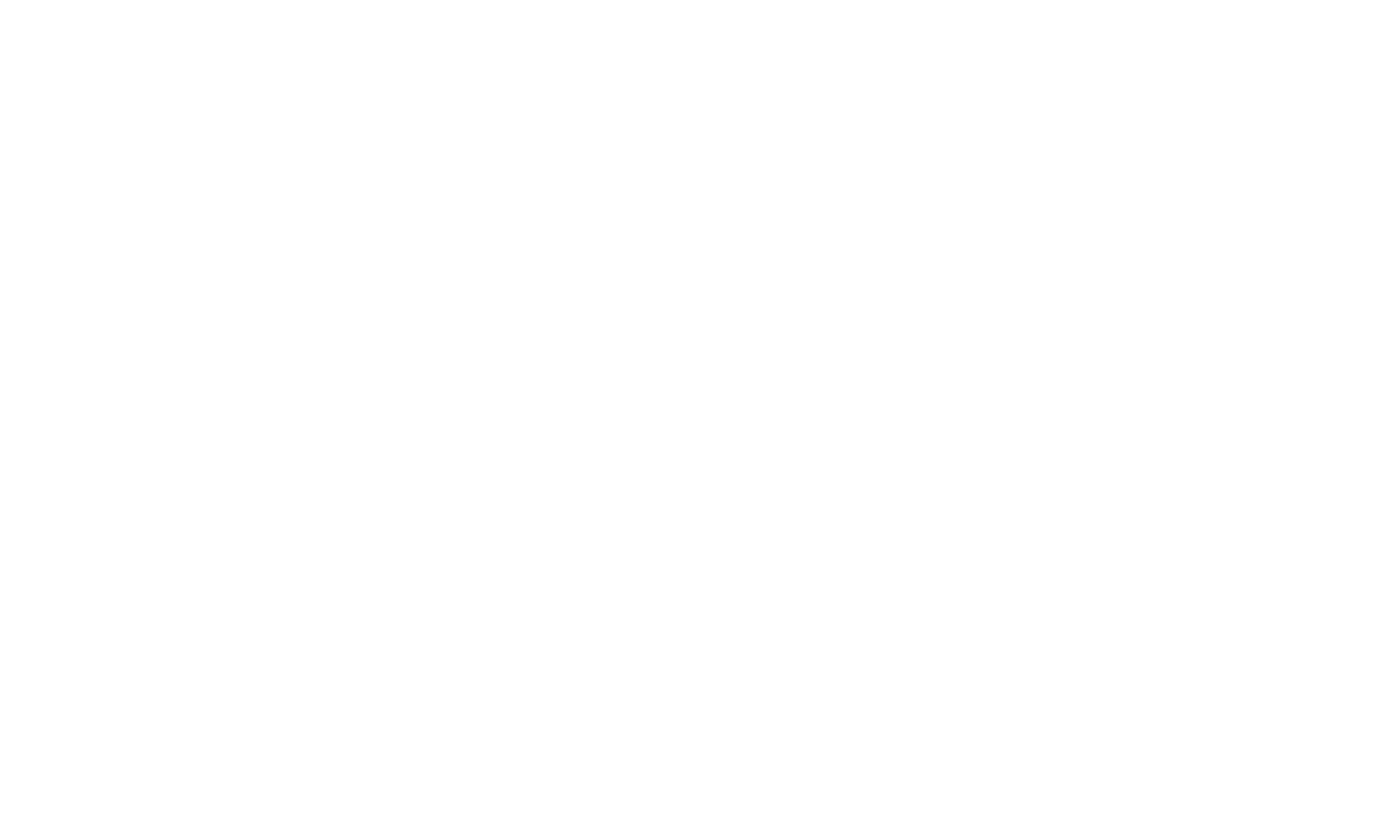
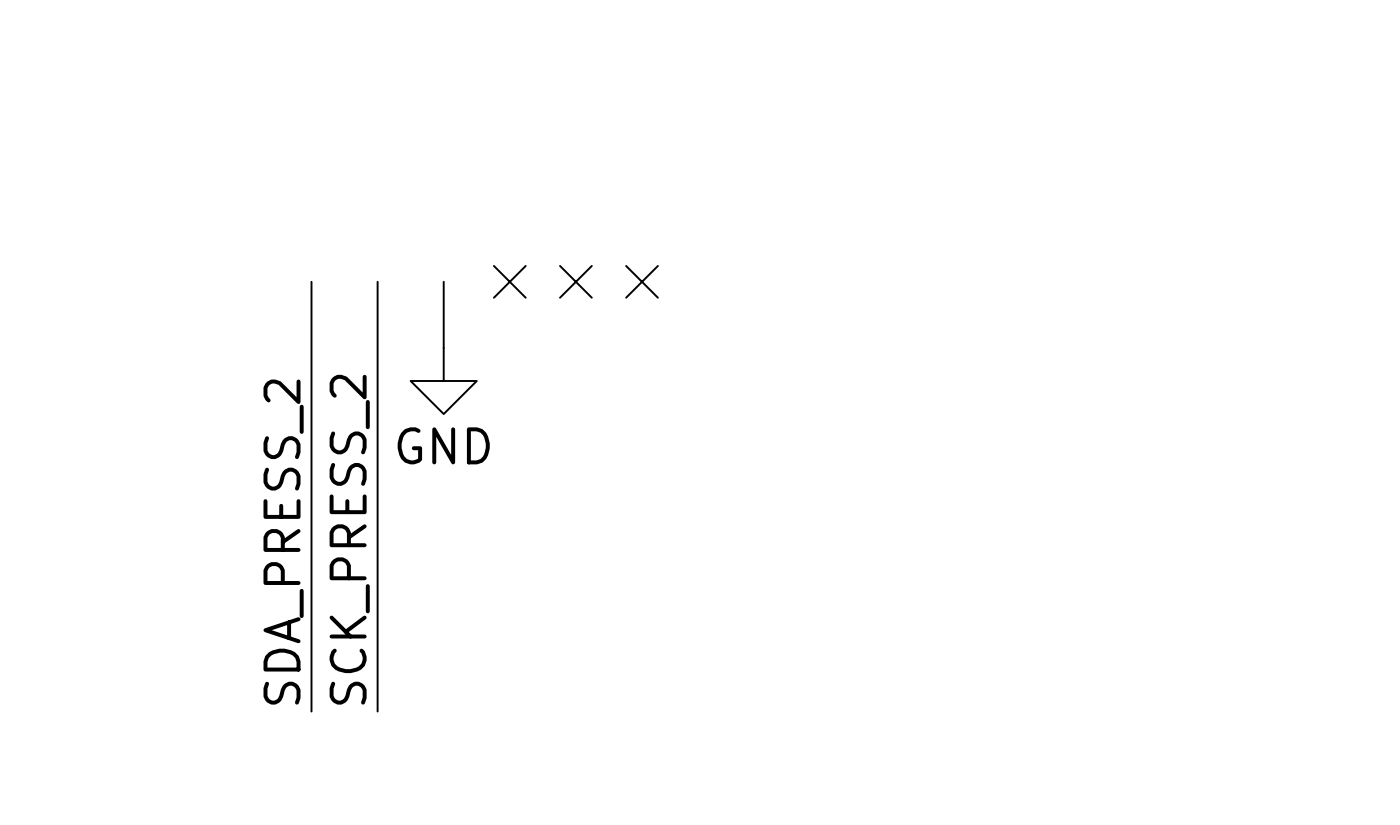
wire: none -> (311, 281) (311, 711)
wire: none -> (377, 281) (377, 711)
wire: none -> (443, 281) (443, 347)
no-connect mark: none -> (509, 281)
no-connect mark: none -> (575, 281)
no-connect mark: none -> (642, 281)
power symbol: none -> GND (443, 380)
label: none -> SCK_PRESS_2 (349, 539)
label: none -> SDA_PRESS_2 (283, 542)

